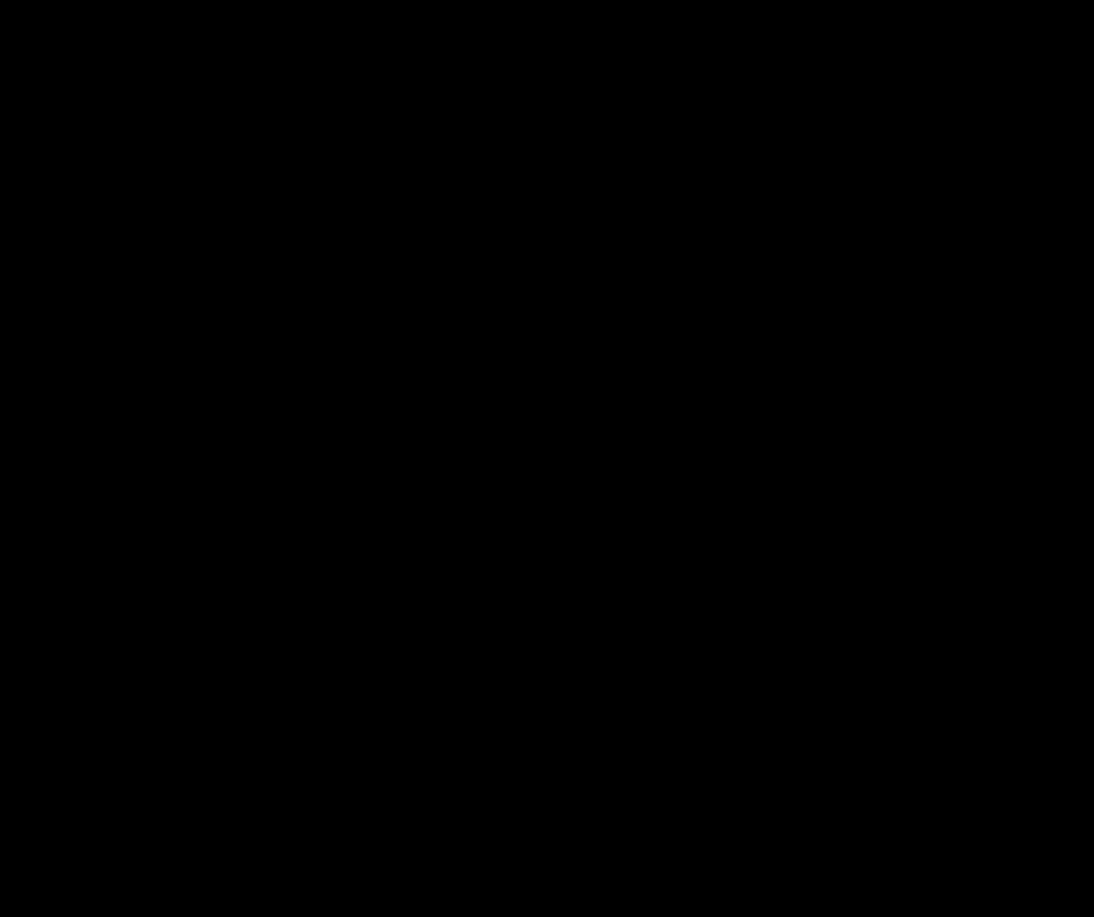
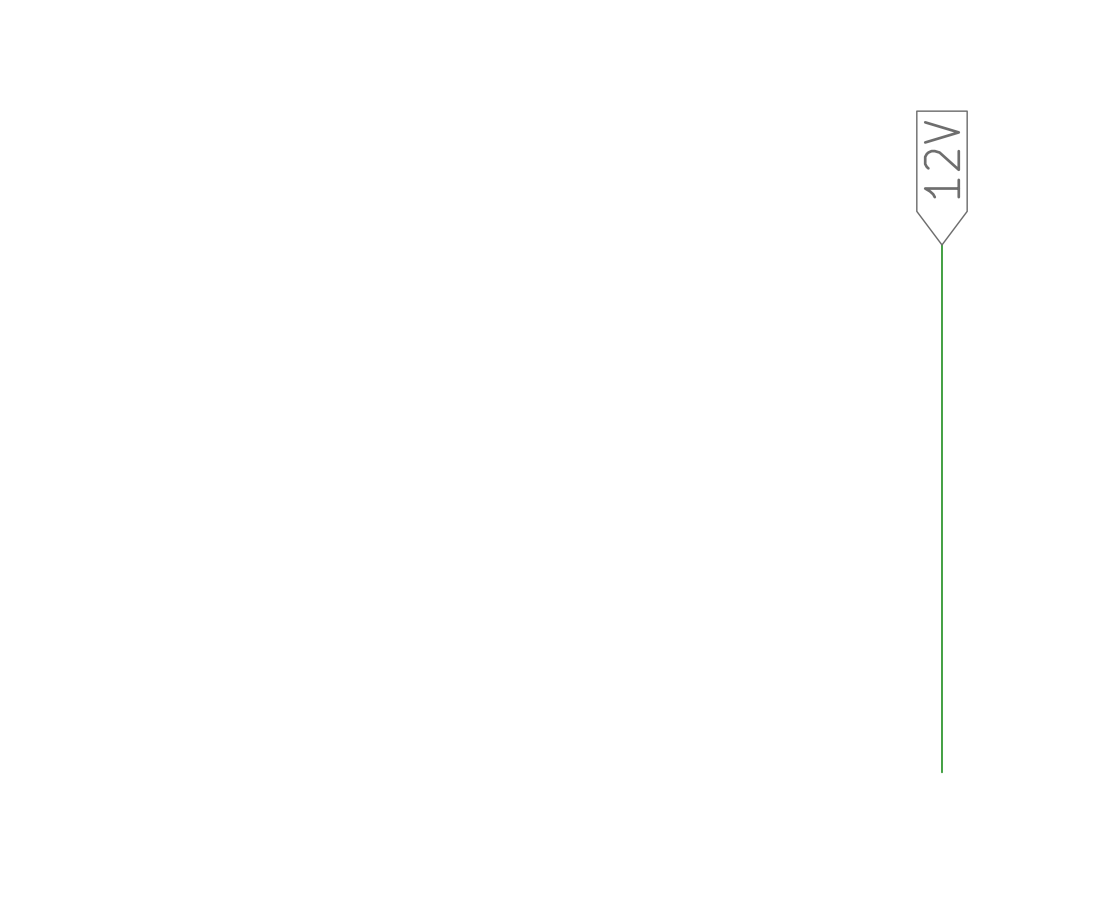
global label: none -> 12V (941, 159)
wire: none -> (941, 244) (941, 772)

